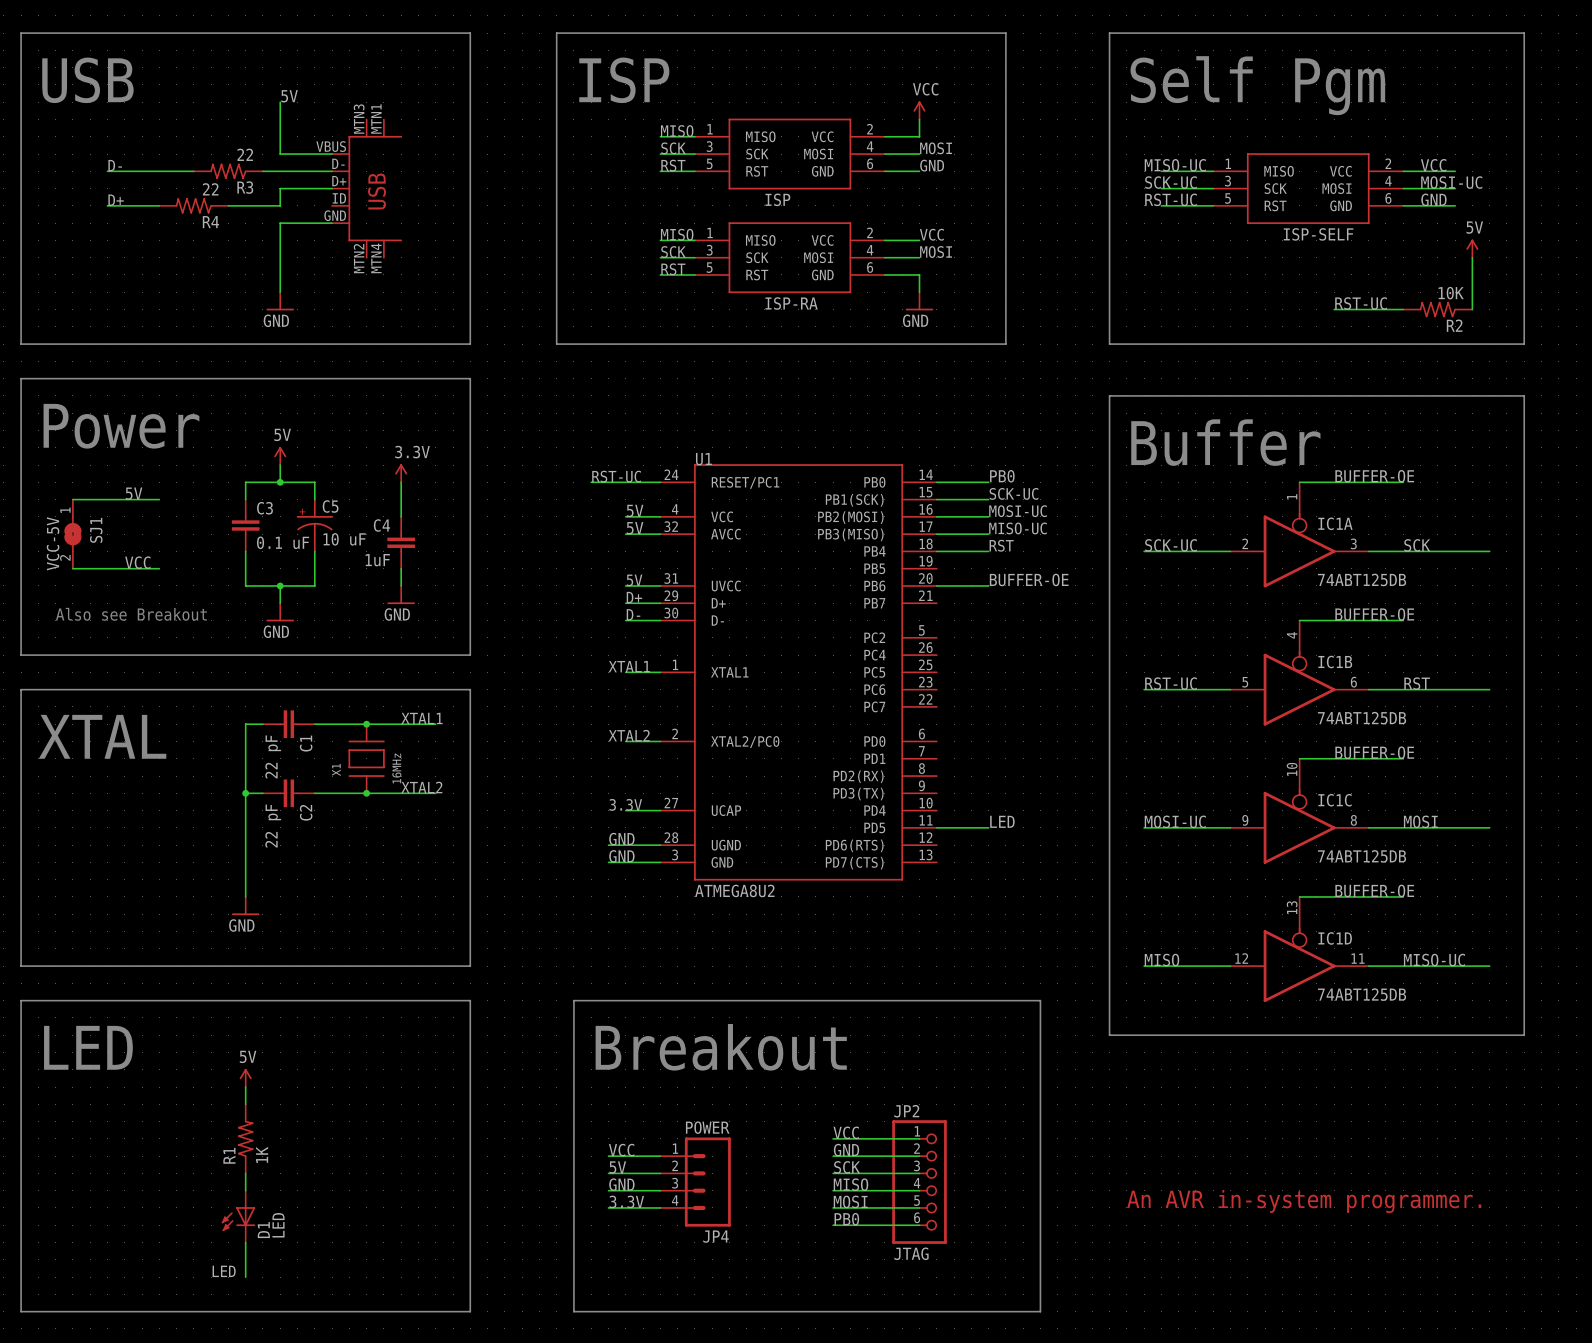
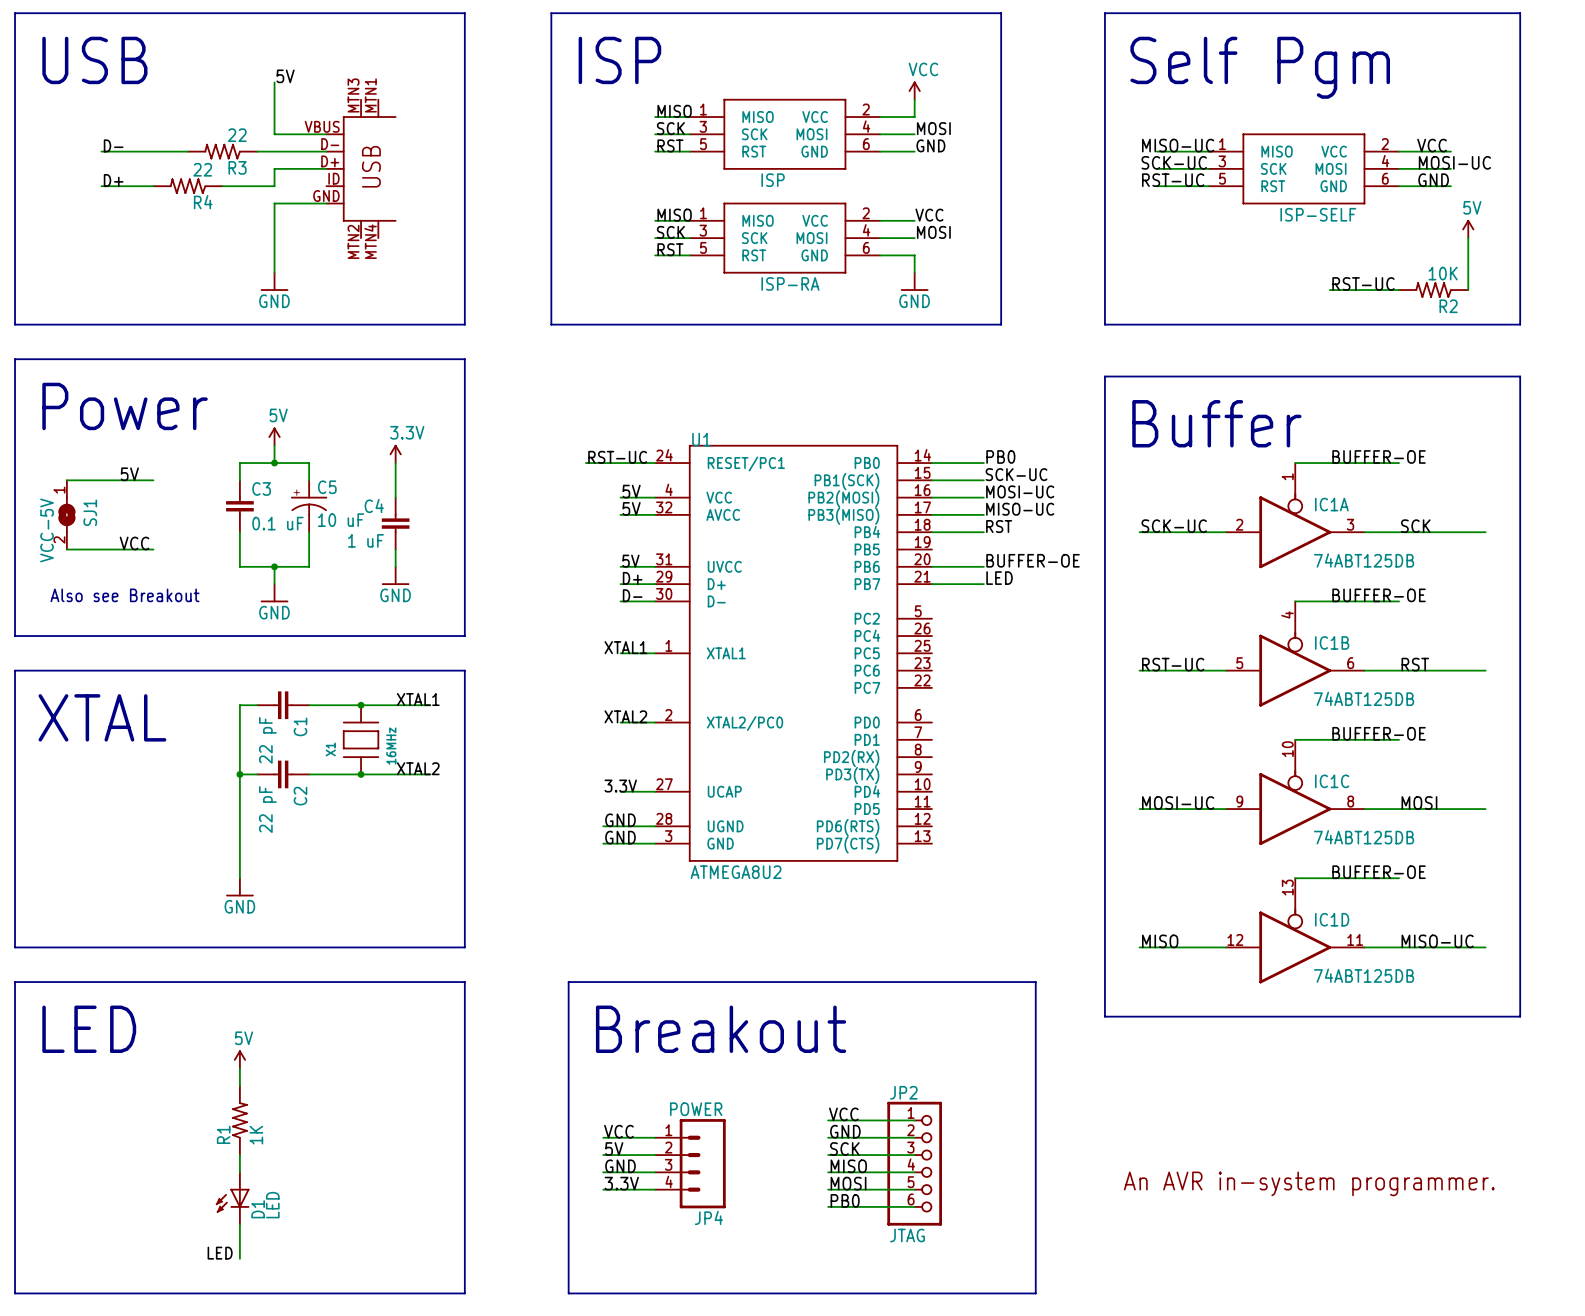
C4 value: 1uF (377, 560) -> 1 uF (365, 540)
label: none -> LED (999, 578)
wire: none -> (931, 584) (983, 584)
label: LED (1002, 821) -> none
wire: (936, 827) (988, 827) -> none

